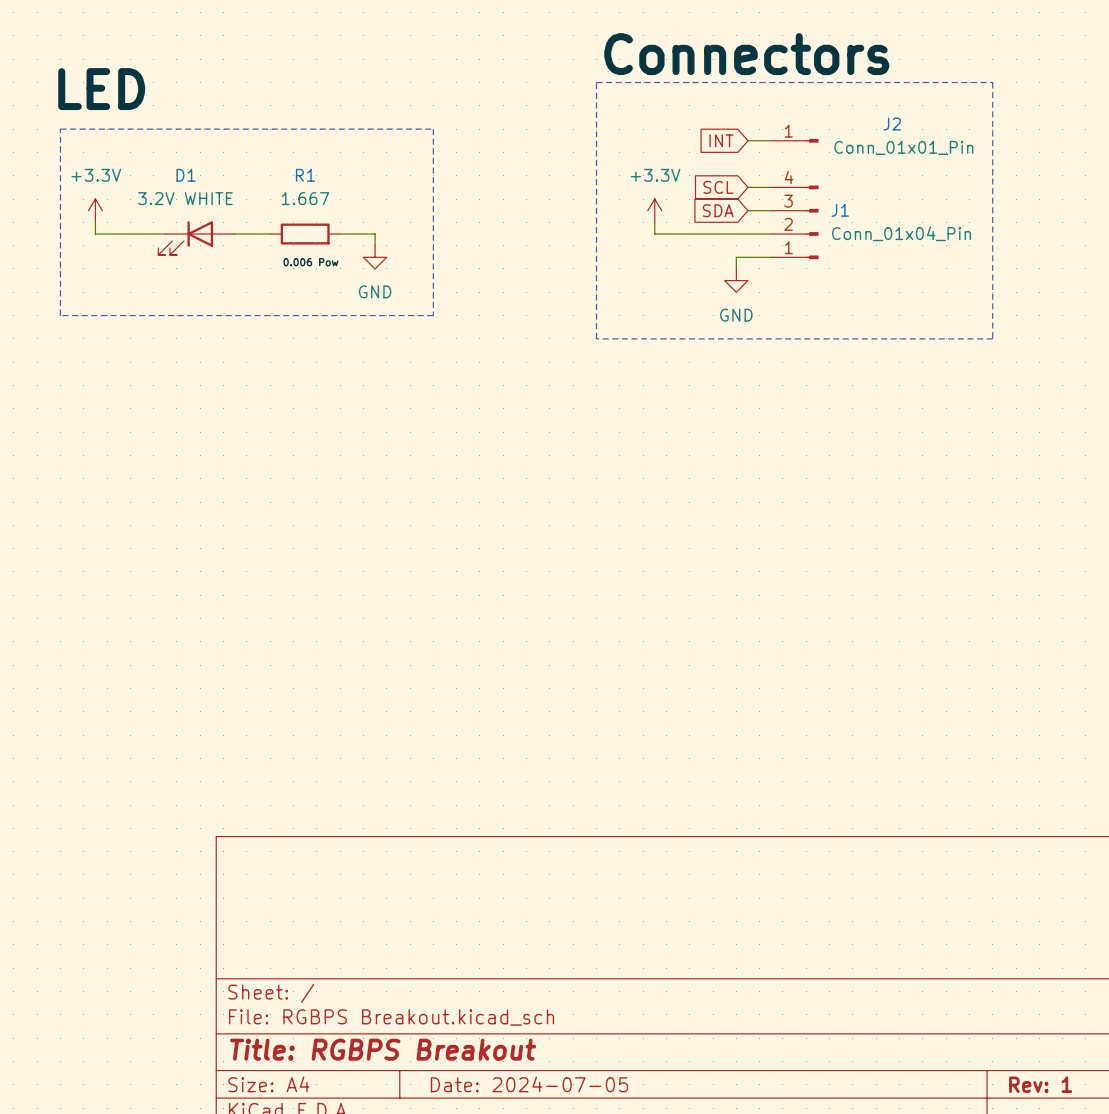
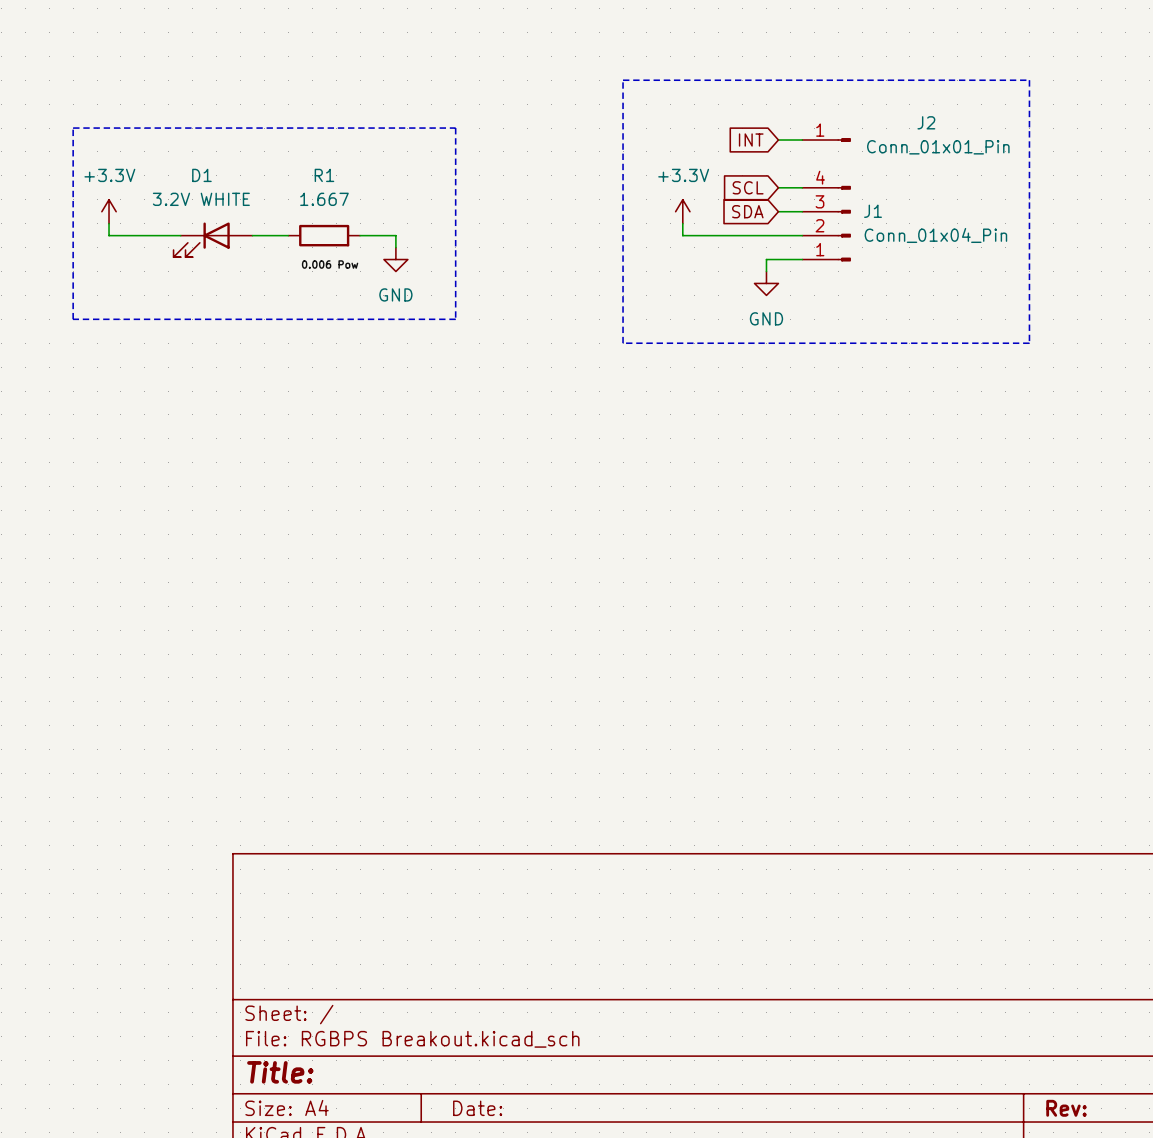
label: Connectors (746, 54) -> none
label: LED (101, 89) -> none
title block: Title: RGBPS Breakout (383, 1049) -> Title: (280, 1072)
title block: Date: 2024-07-05 (529, 1084) -> Date: (477, 1108)
title block: Rev: 1 (1040, 1084) -> Rev: (1066, 1108)

